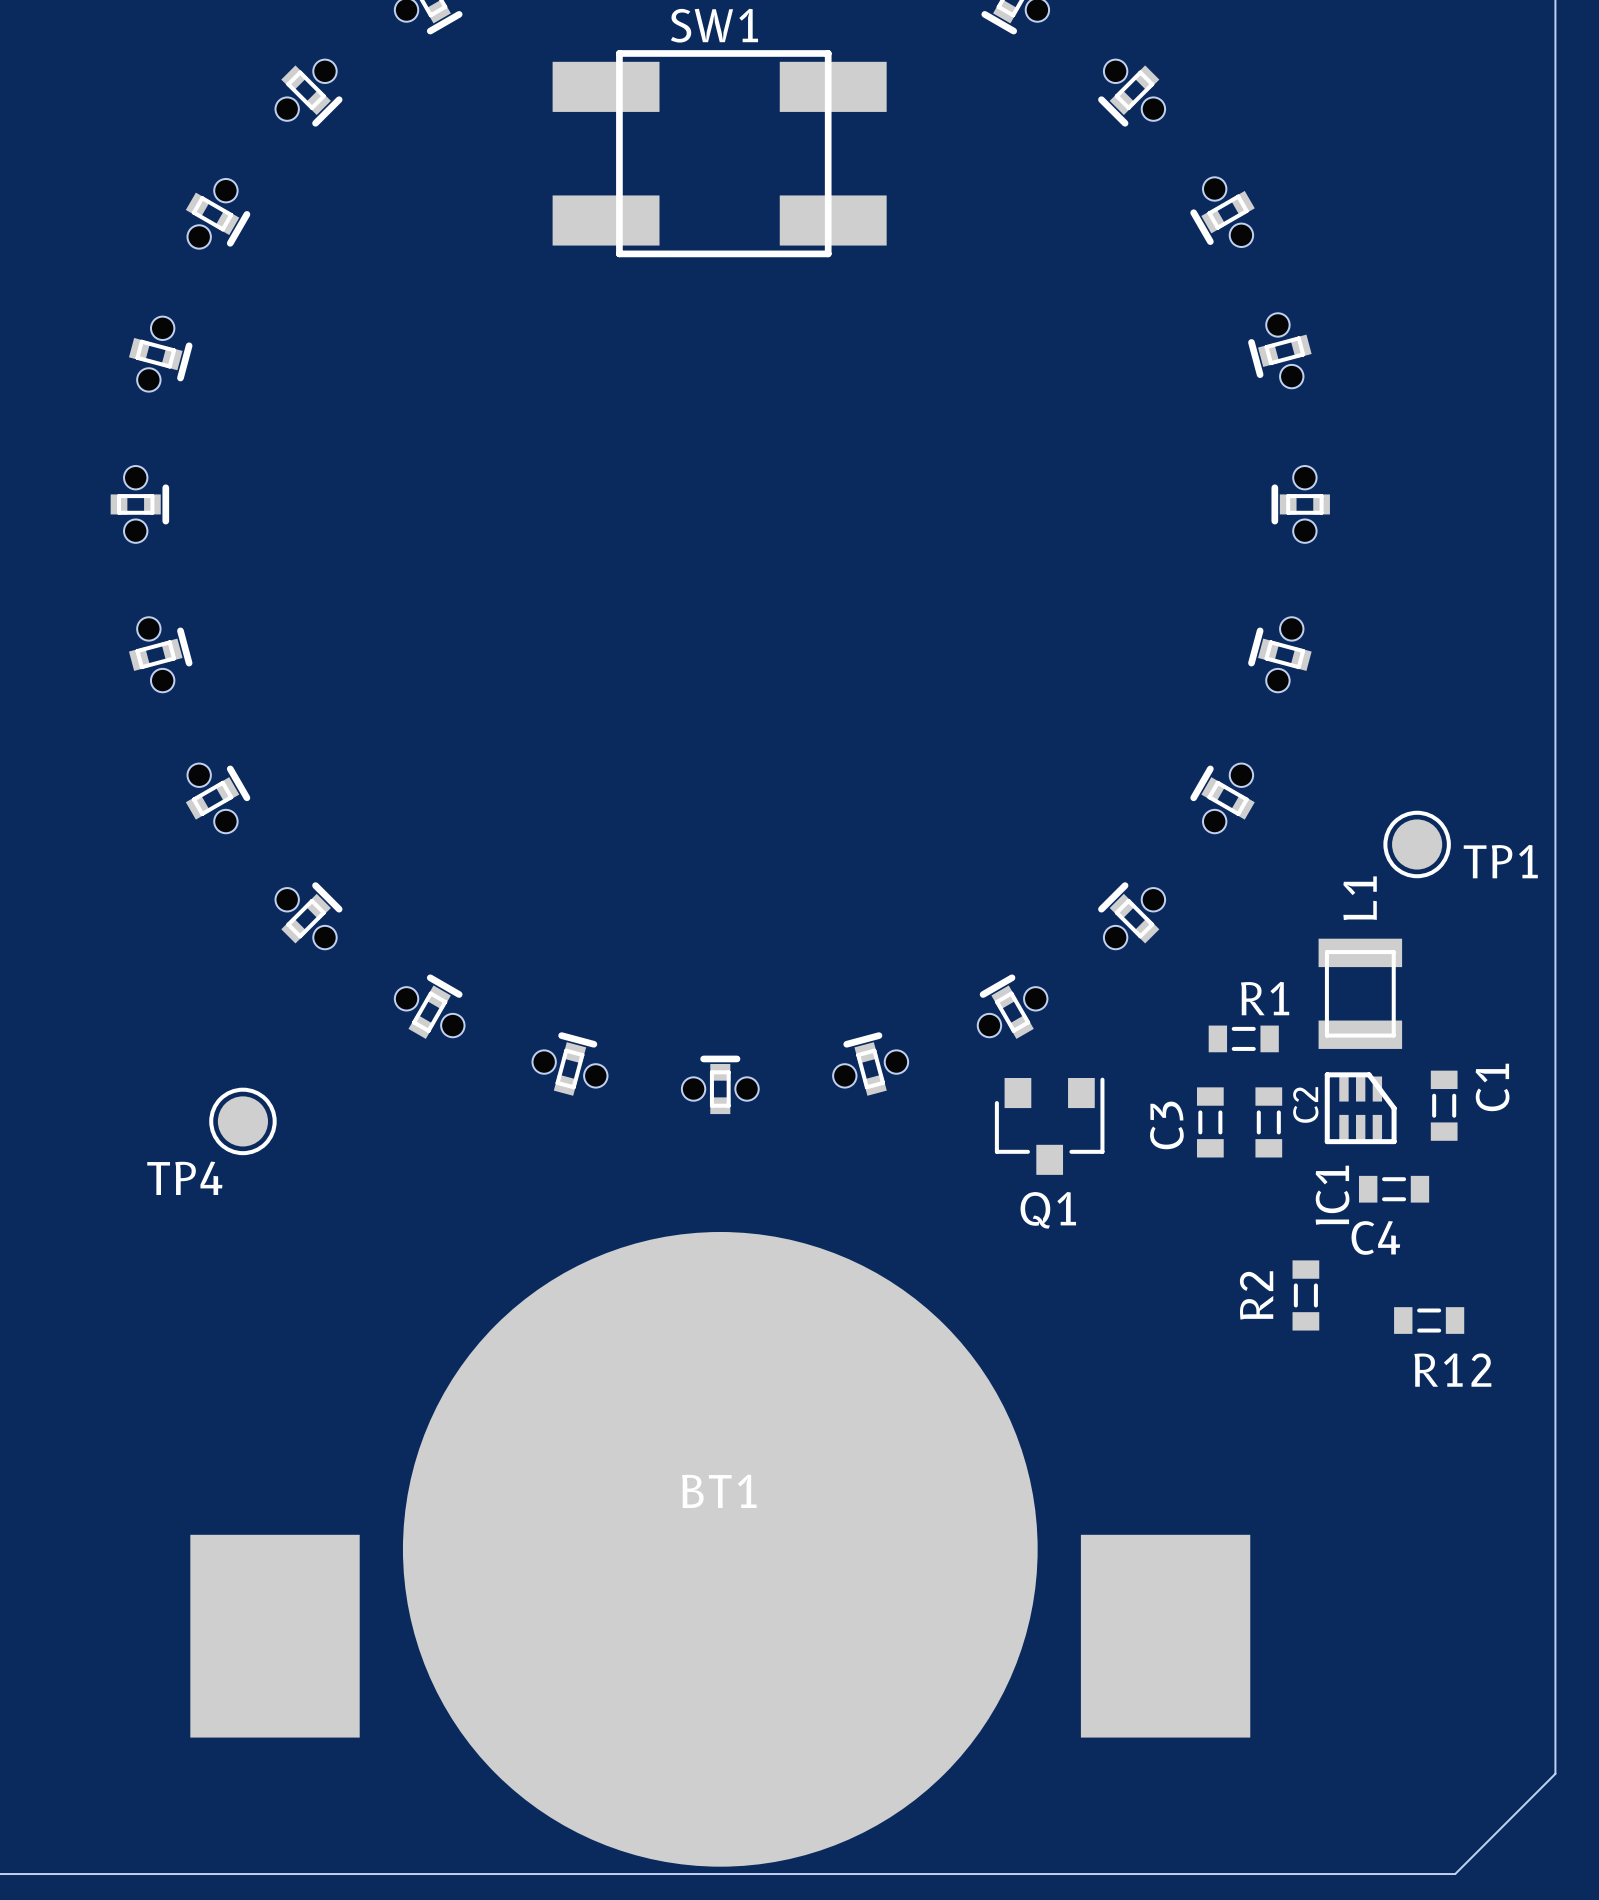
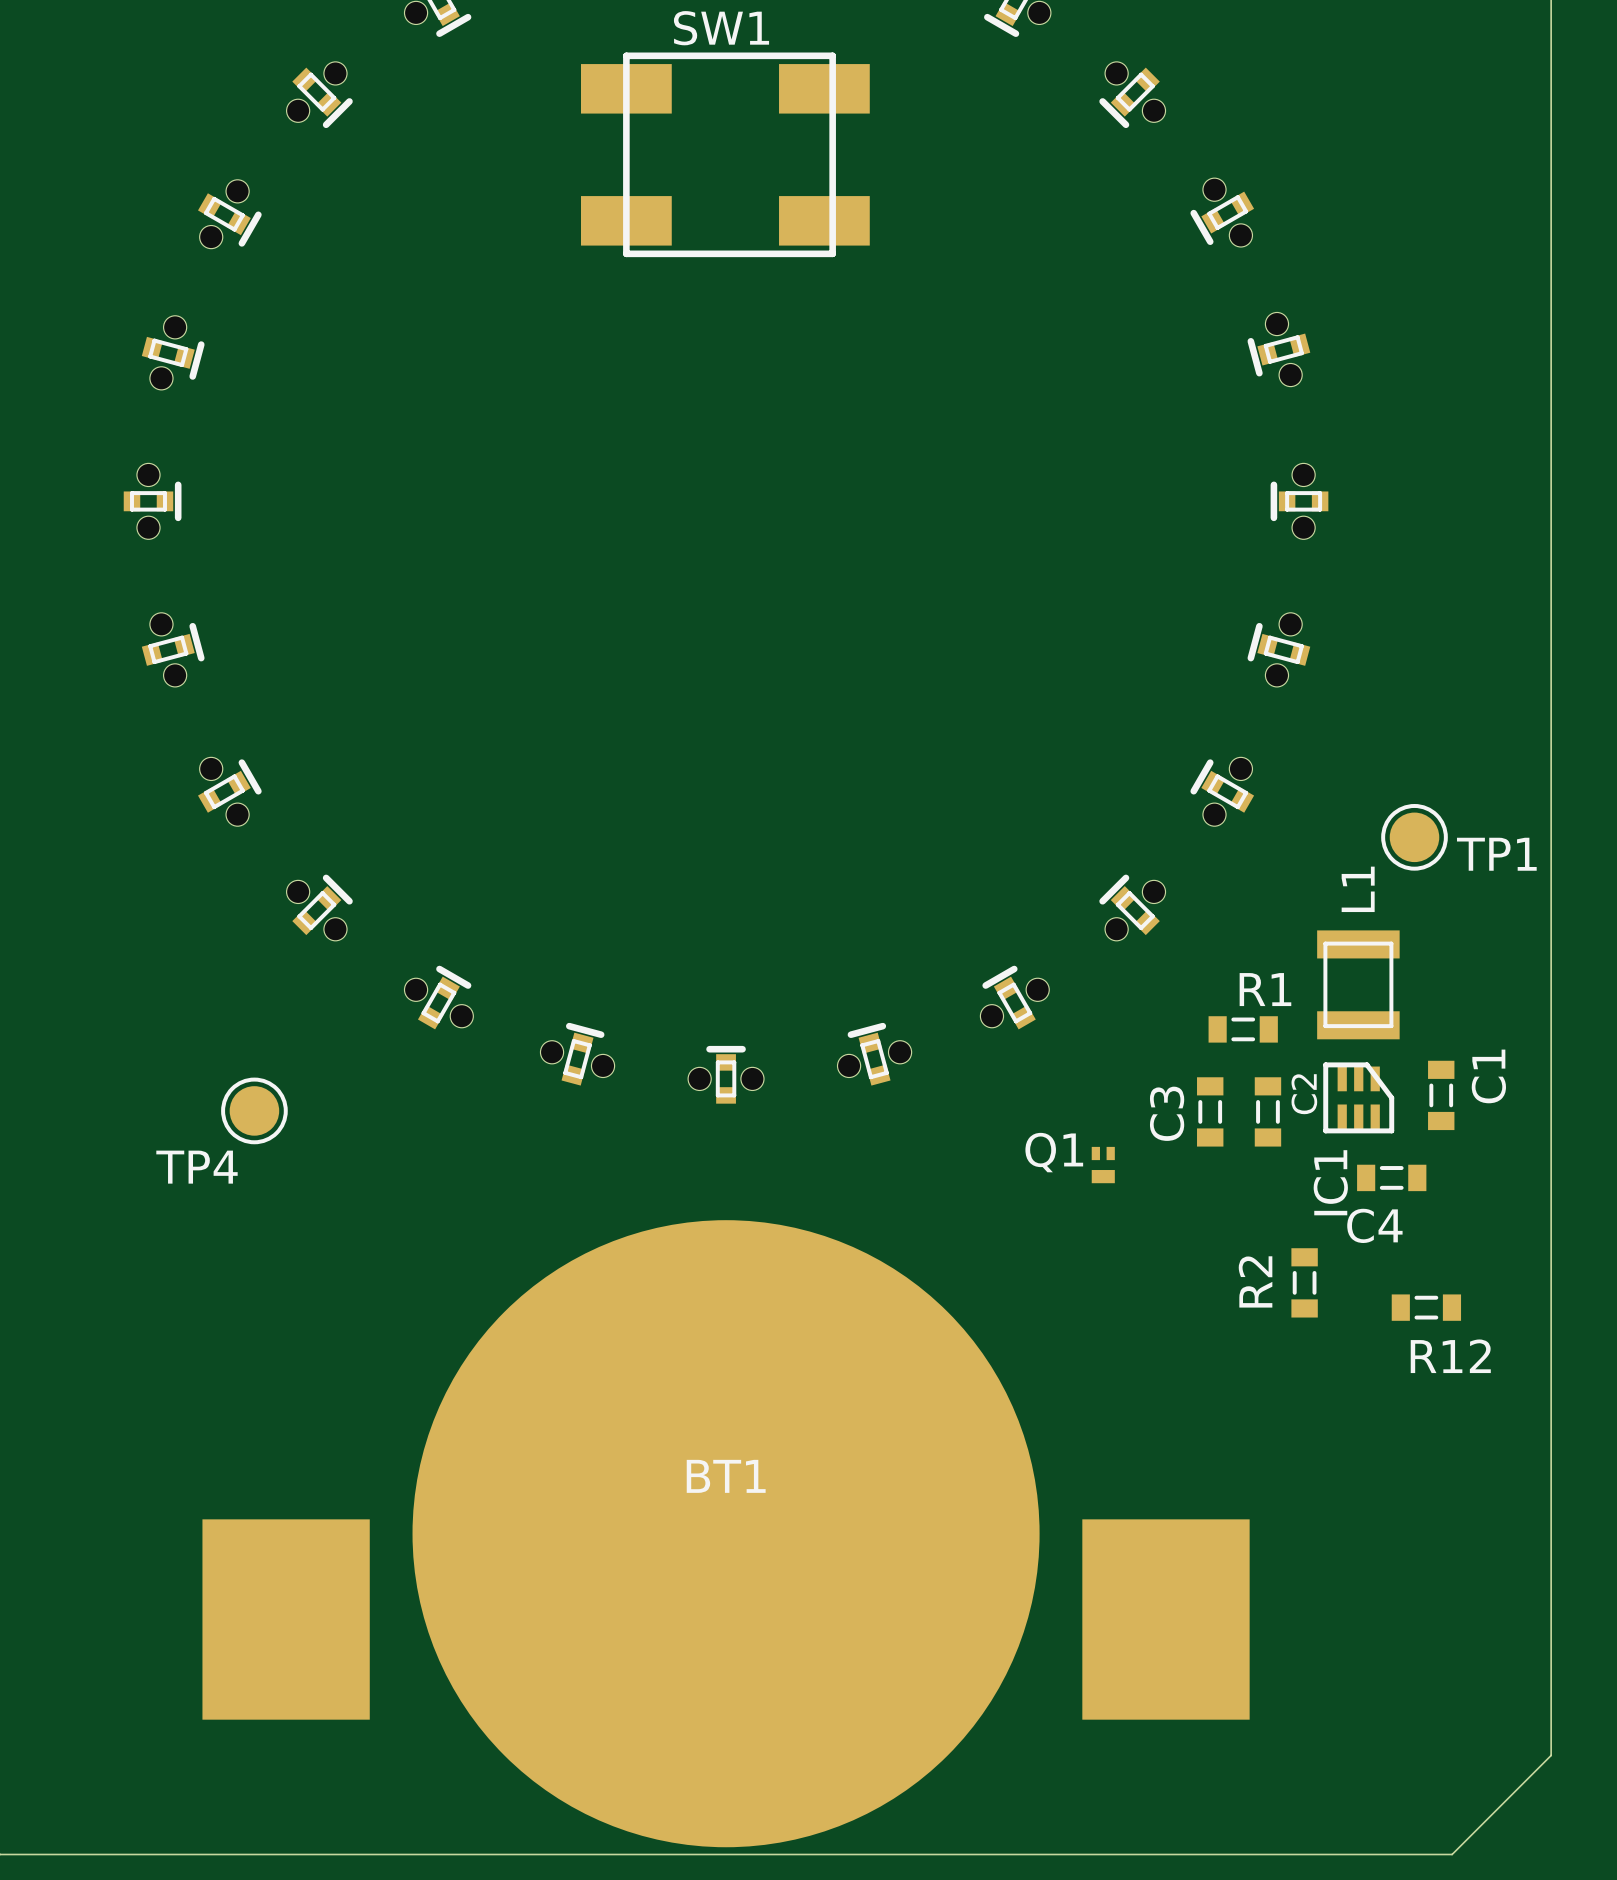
SW1 footprint: [552, 50, 887, 258] -> [581, 52, 870, 258]
Q1 footprint: [994, 1077, 1105, 1175] -> [1091, 1146, 1115, 1184]
Q1 name position: Q1 (1048, 1210) -> Q1 (1054, 1152)

